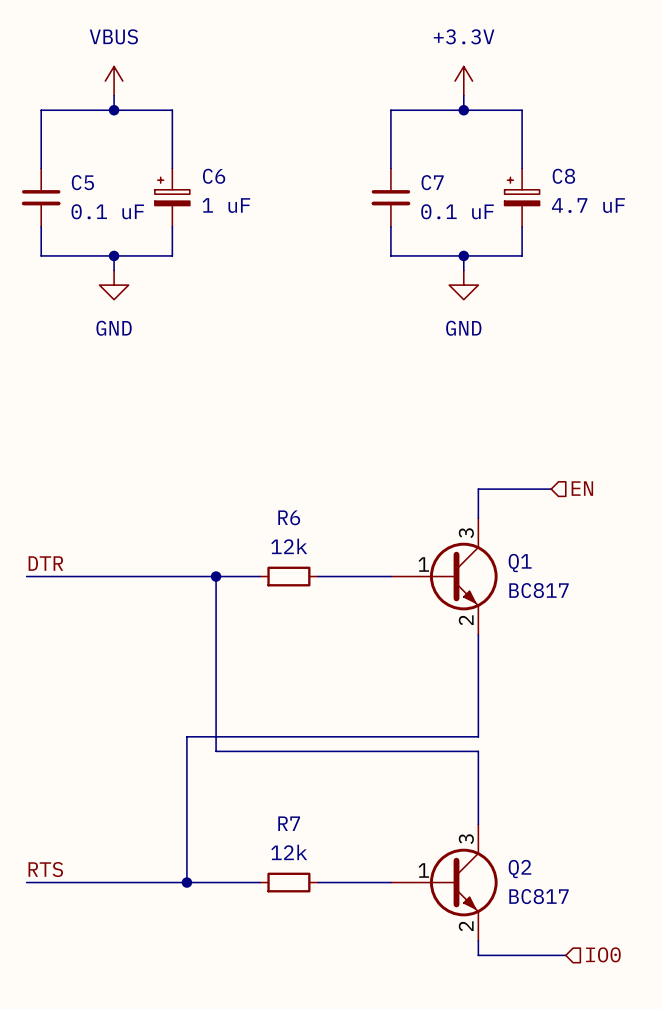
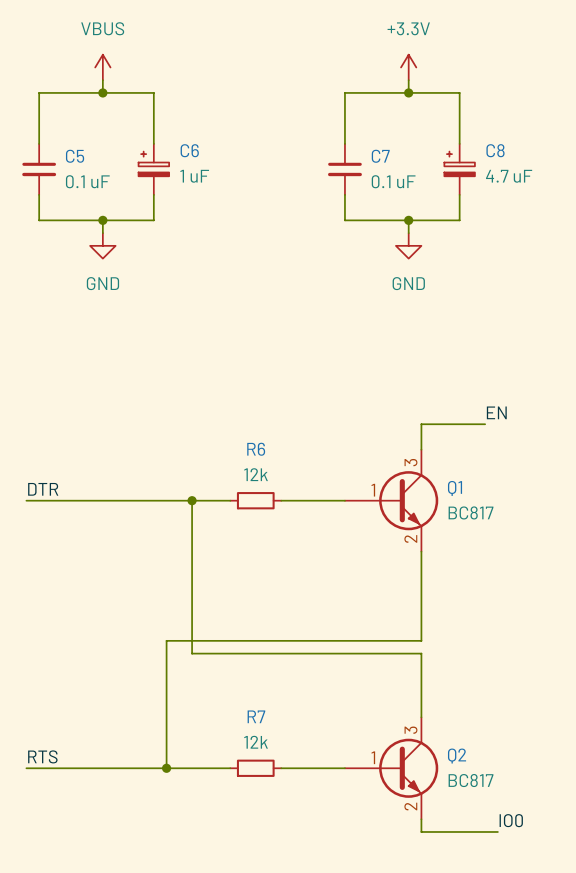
label: none -> EN (496, 412)
hierarchical label: EN (582, 488) -> none
label: none -> IO0 (511, 820)
hierarchical label: IO0 (603, 954) -> none

